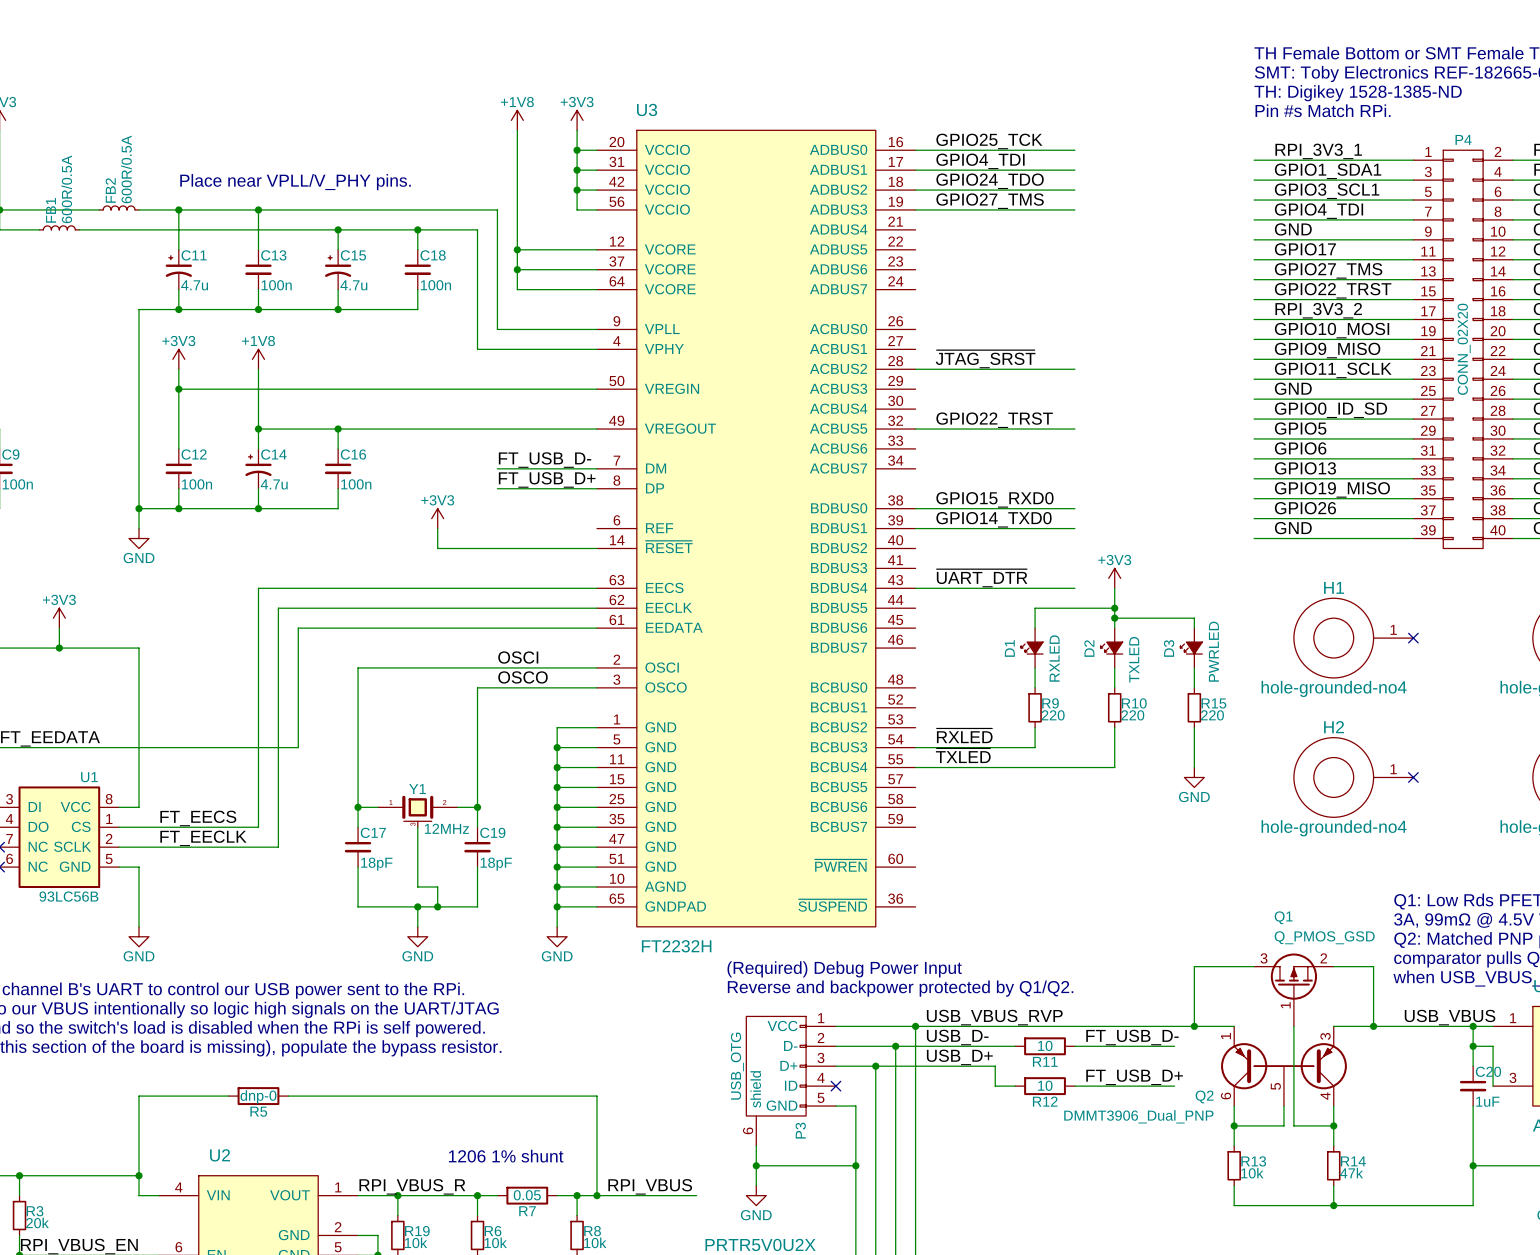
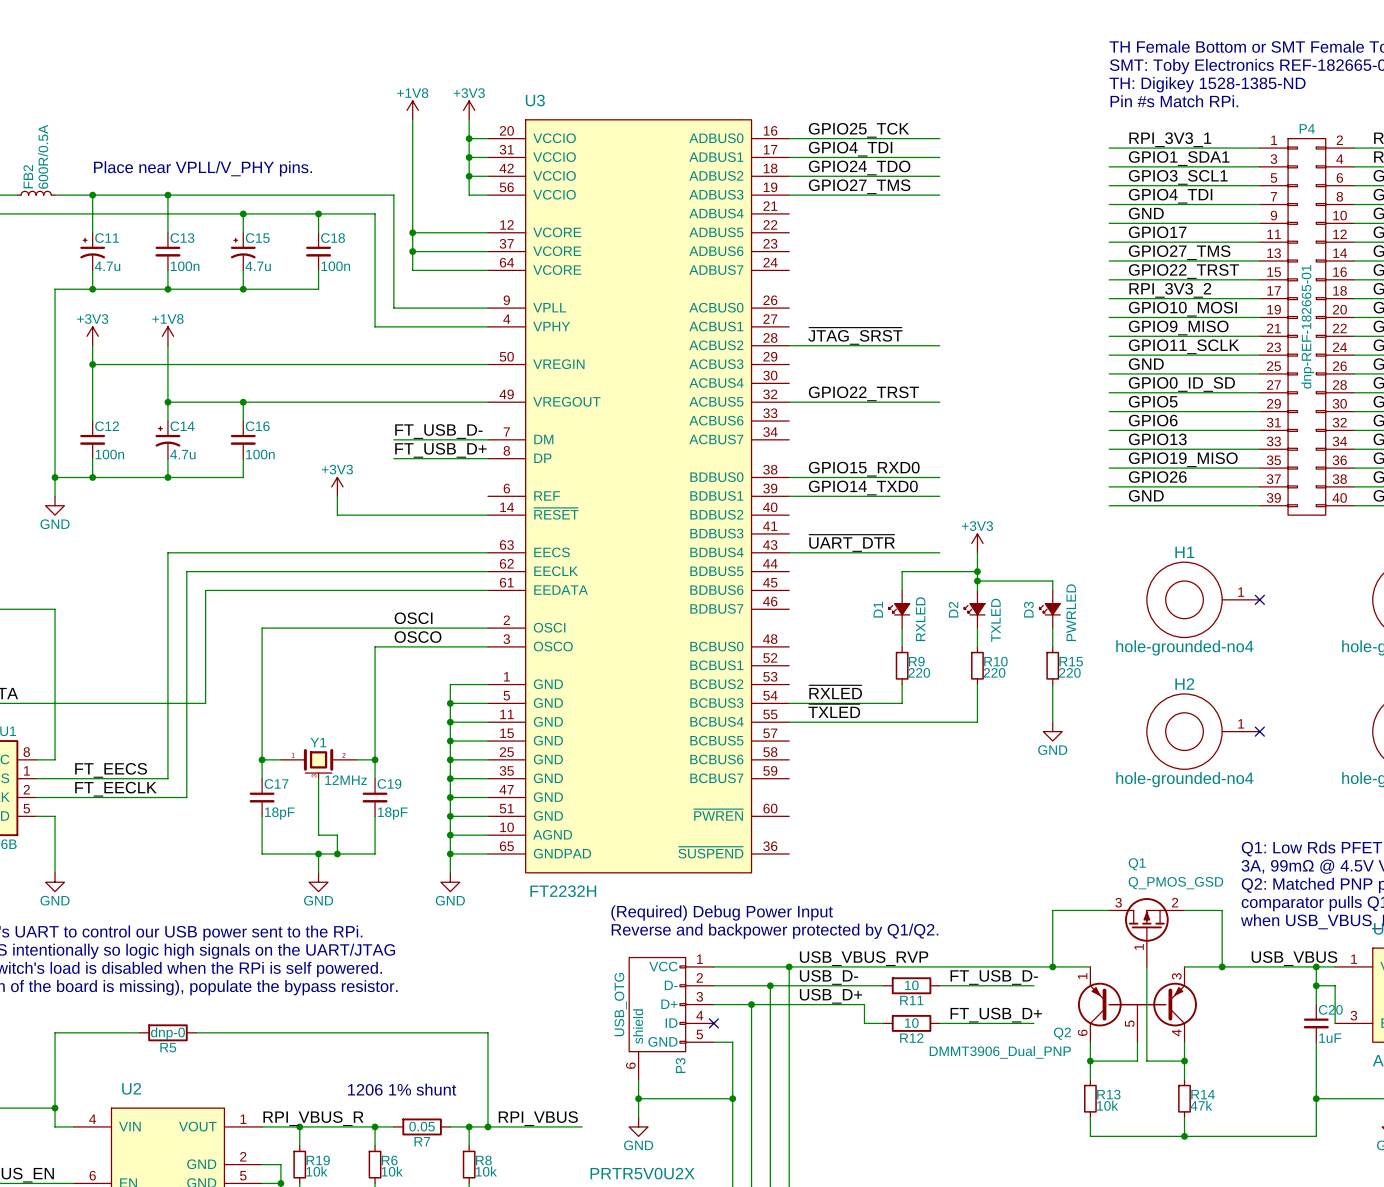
P4 value: CONN_02X20 (1464, 349) -> dnp-REF-182665-01 (1307, 326)

